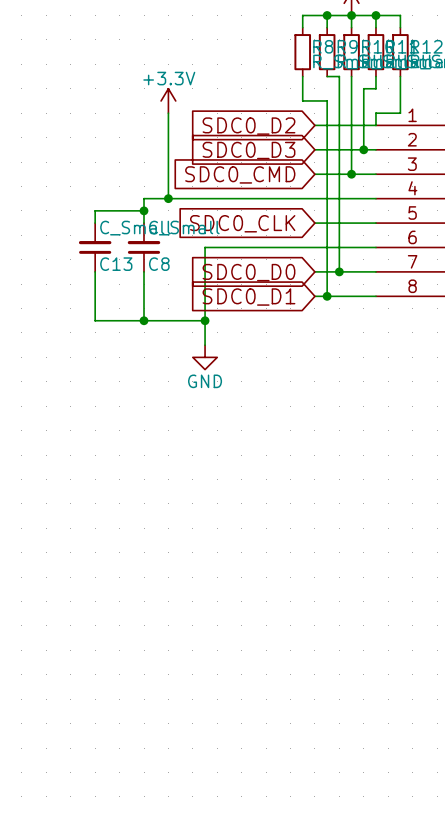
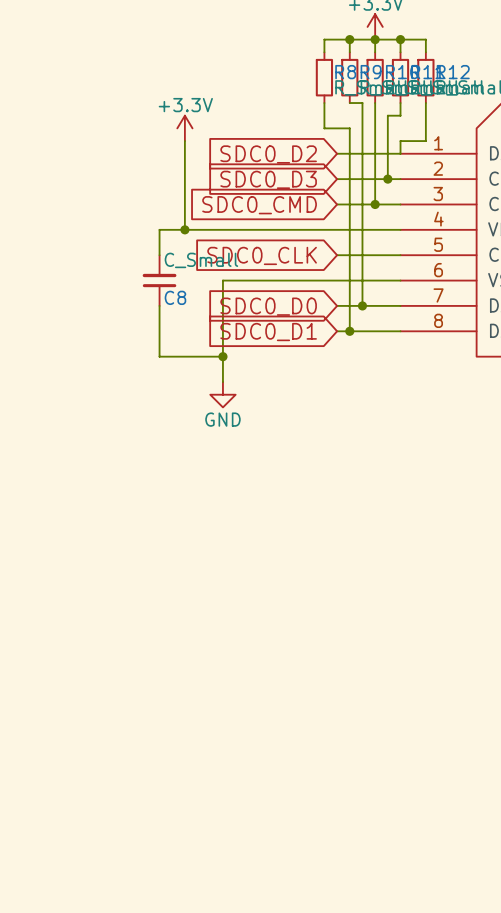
wire: (144, 210) (95, 210) (95, 223) -> none
junction: (144, 210) -> none
C13: C_Small (95, 247) -> none
wire: (95, 271) (95, 320) (144, 320) -> none
junction: (144, 320) -> none

